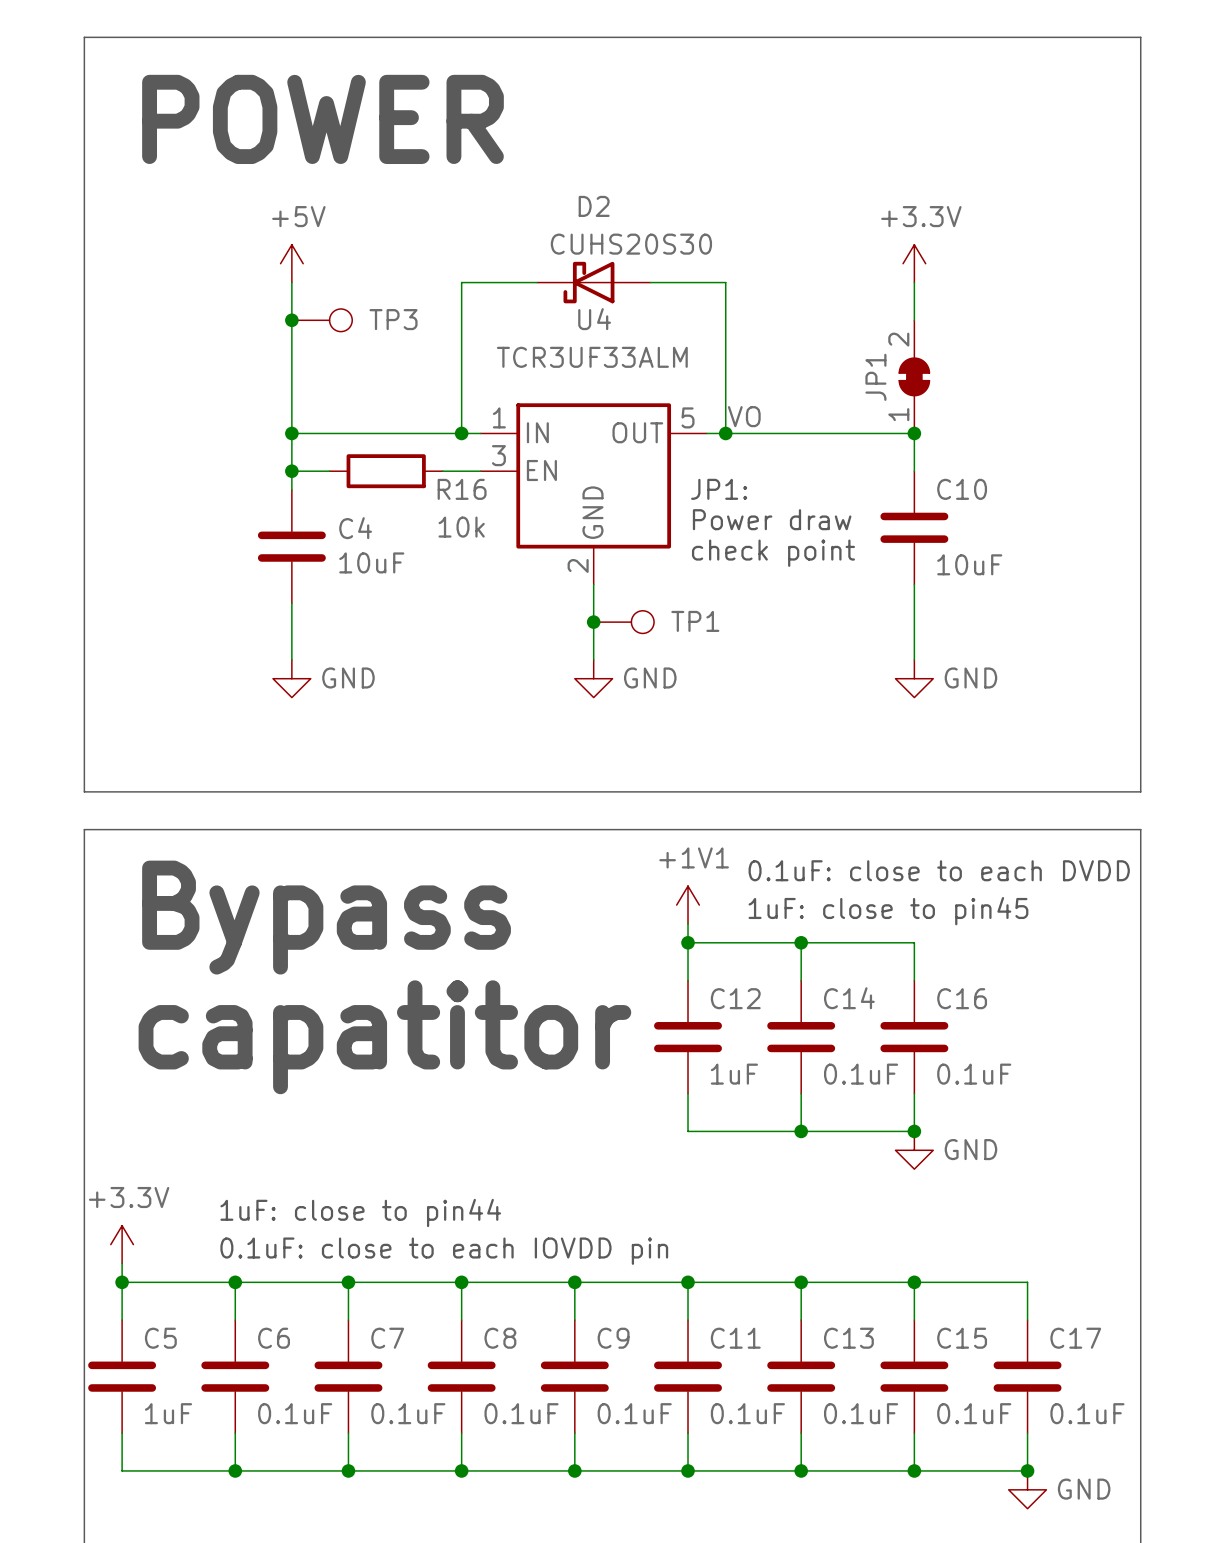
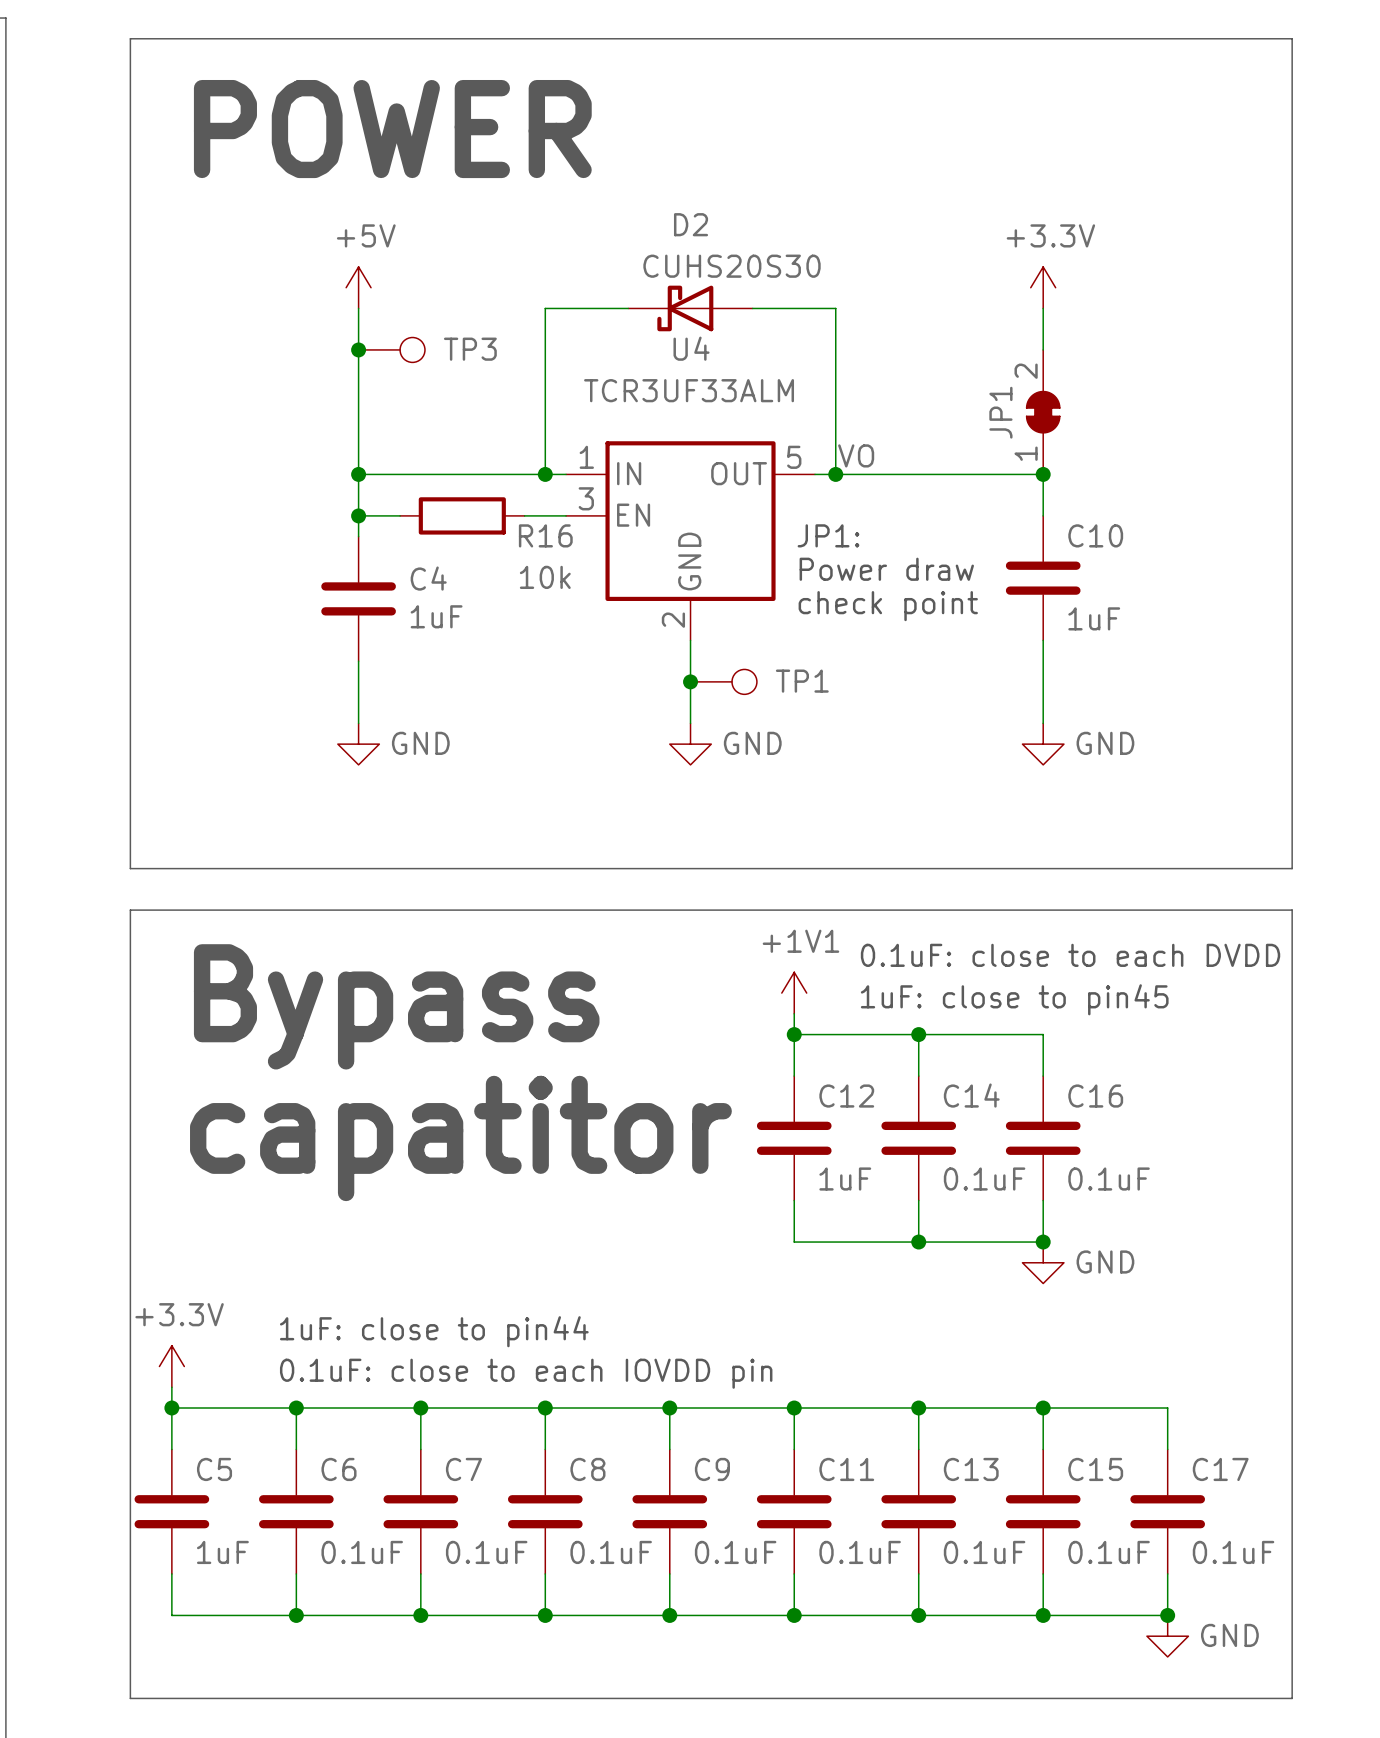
C4 value: 10uF (371, 562) -> 1uF (436, 616)
C10 value: 10uF (969, 564) -> 1uF (1094, 618)

